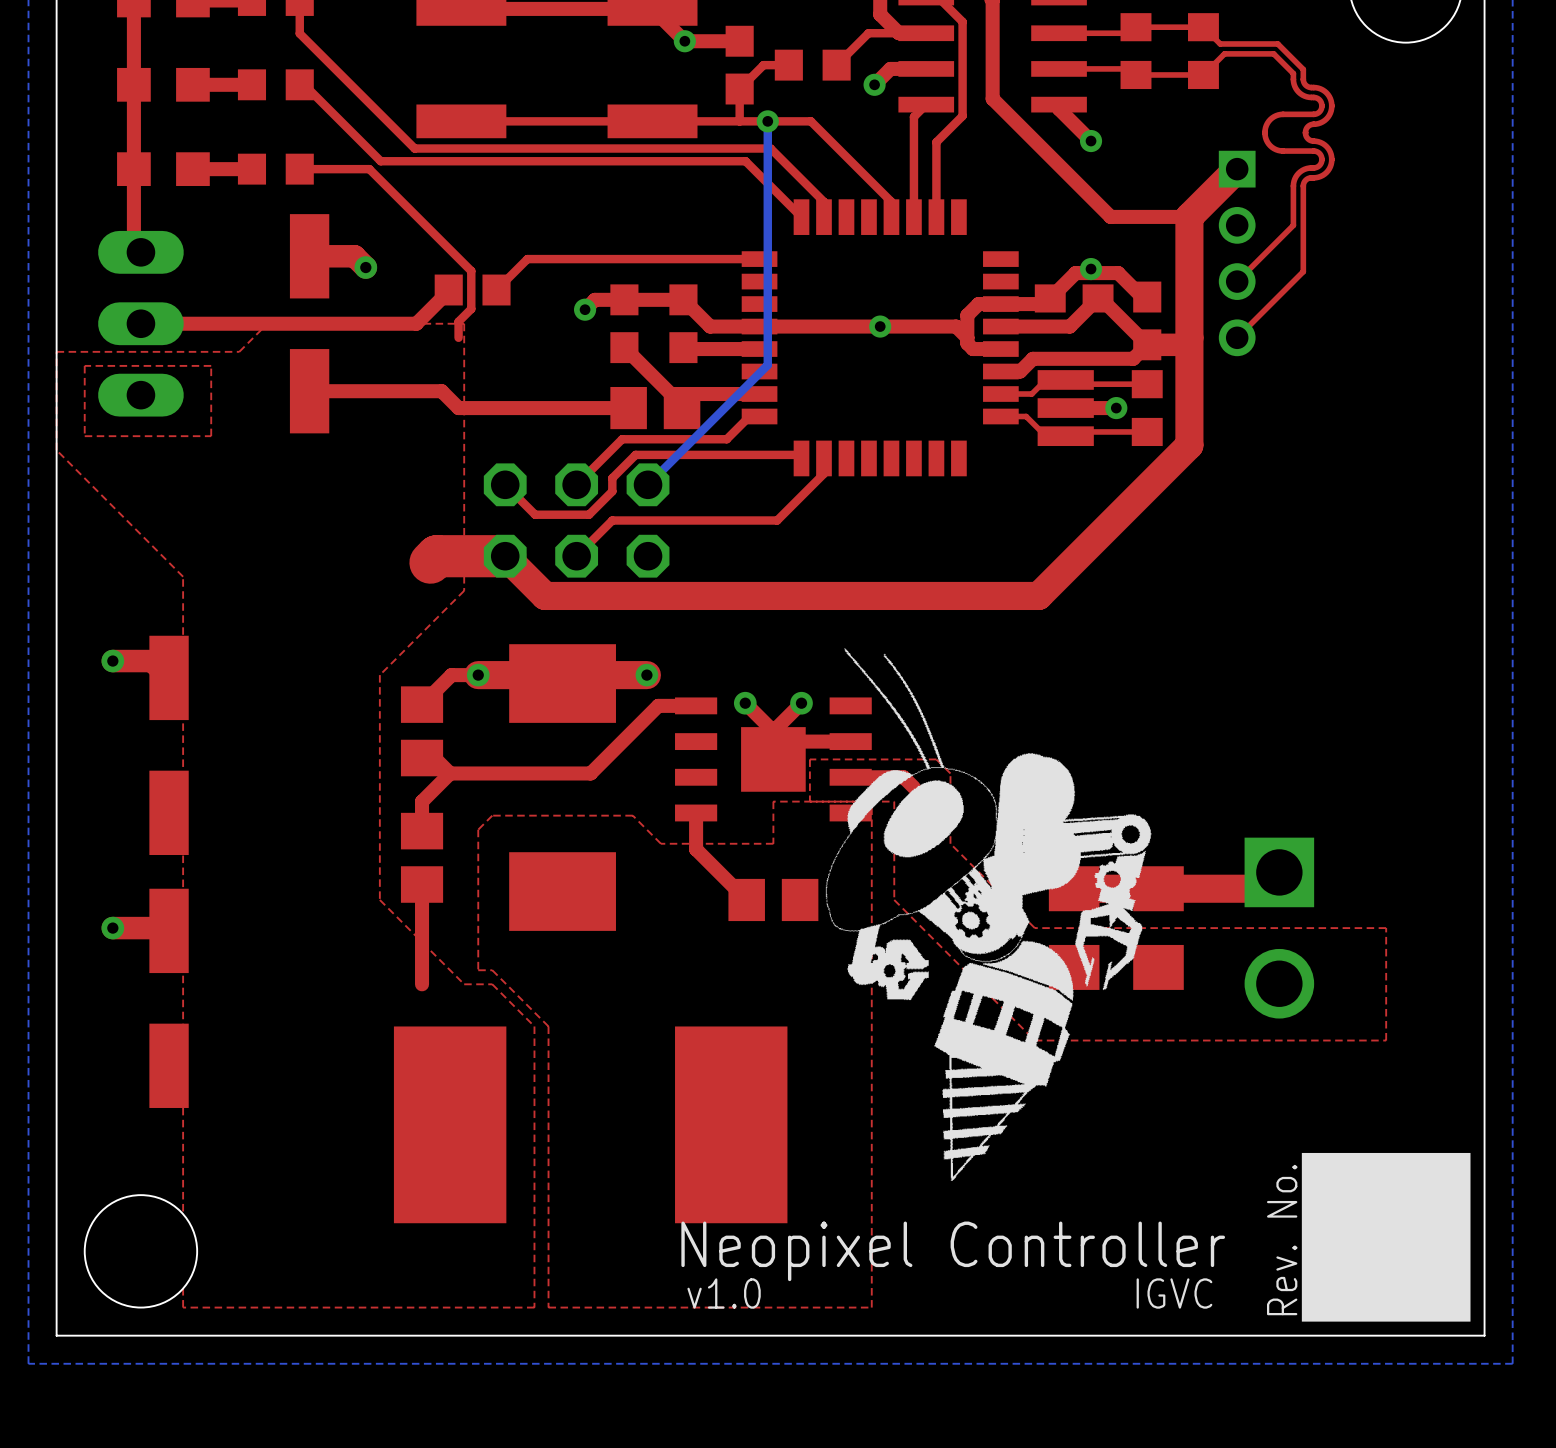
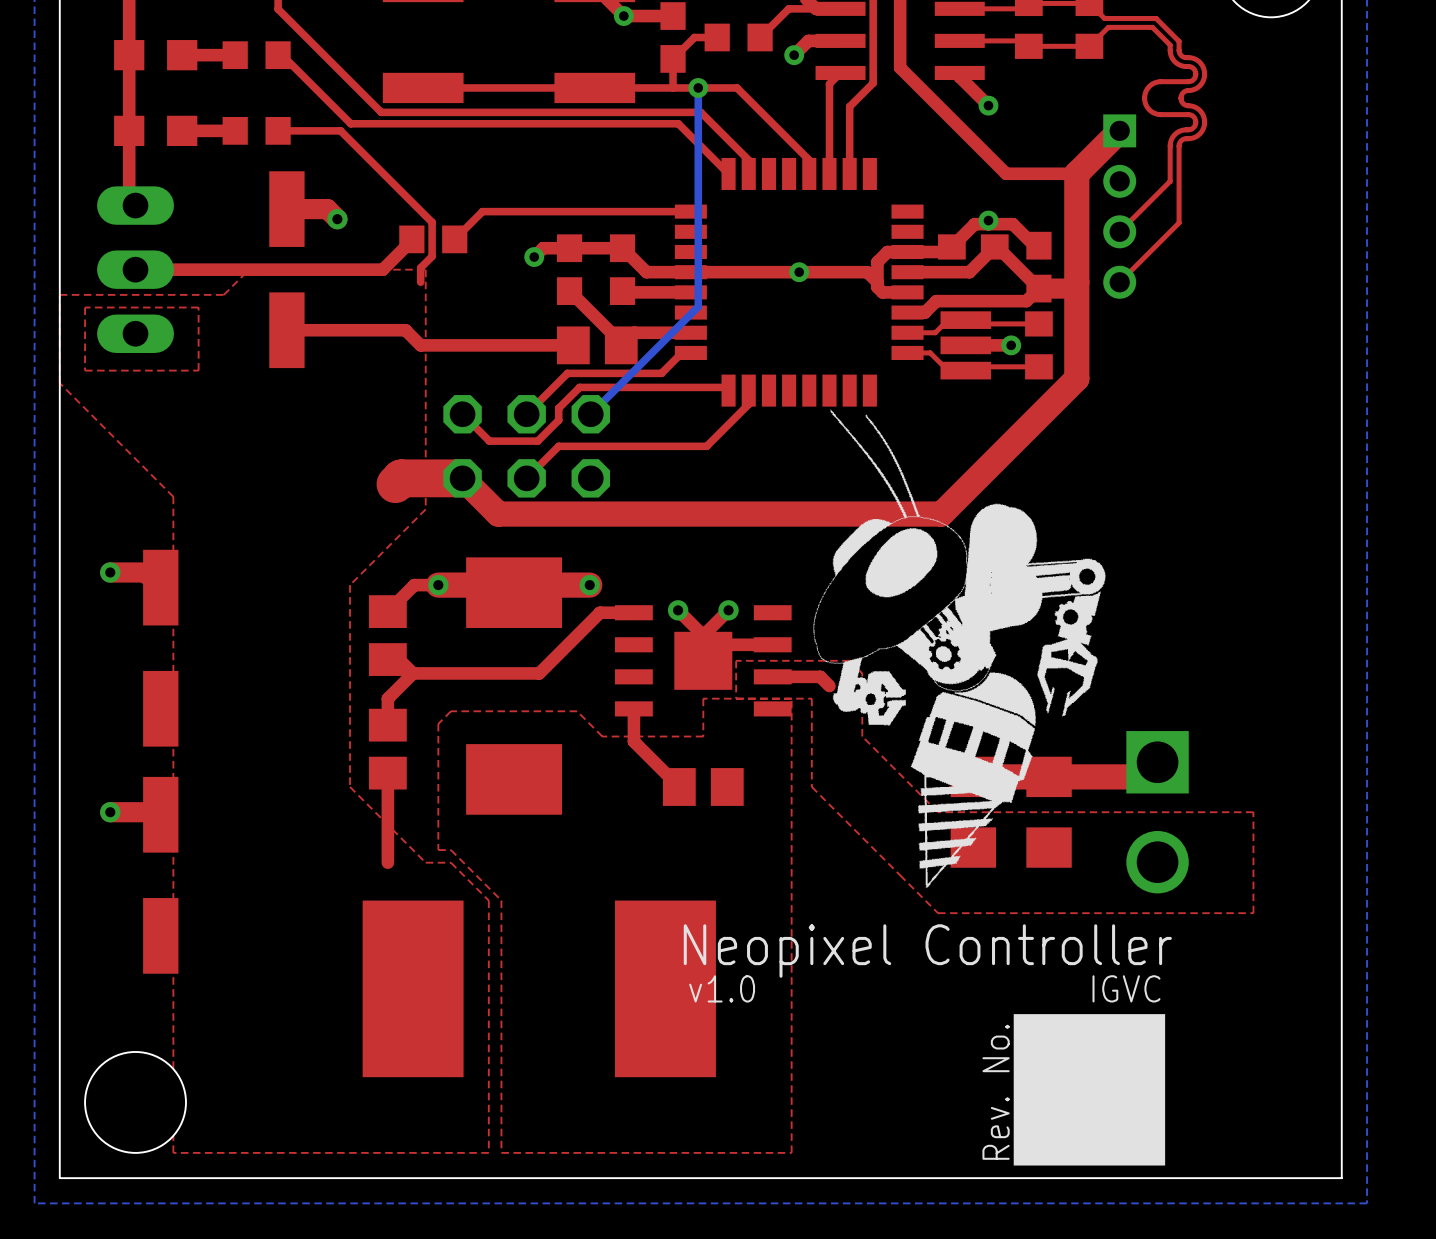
drawing position: (988, 914) -> (959, 648)
drawing position: (1386, 1237) -> (1089, 1089)
text position: Rev. No. (1282, 1240) -> Rev. No. (996, 1092)
text position: Neopixel Controller (953, 1251) -> Neopixel Controller (927, 951)
text position: v1.0 (724, 1293) -> v1.0 (722, 988)
text position: IGVC (1174, 1293) -> IGVC (1126, 988)

